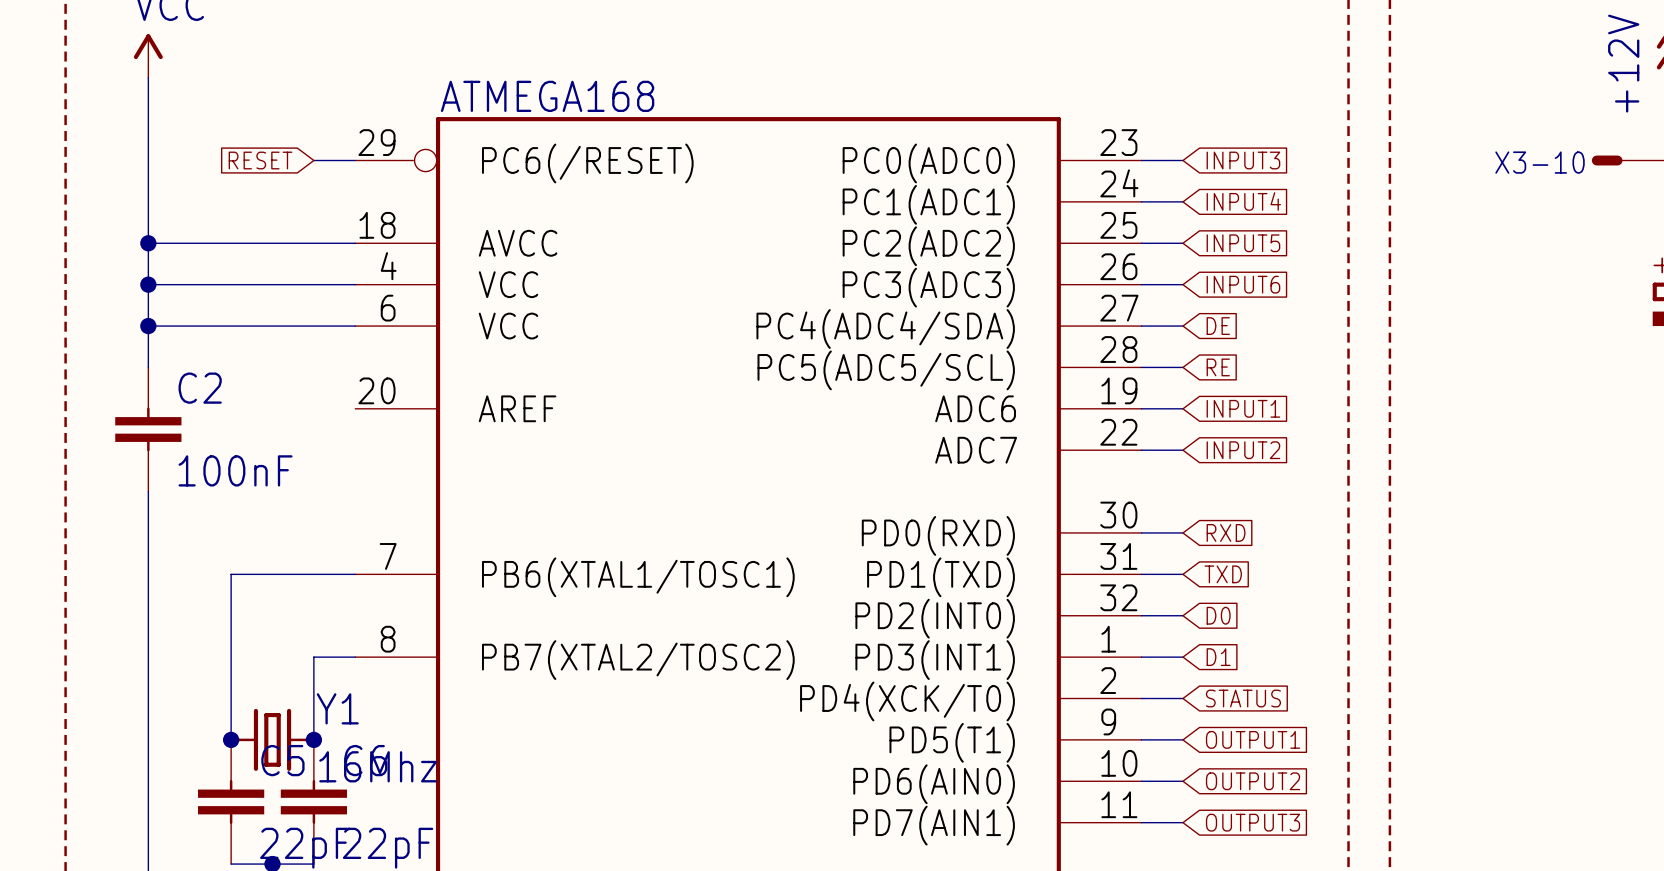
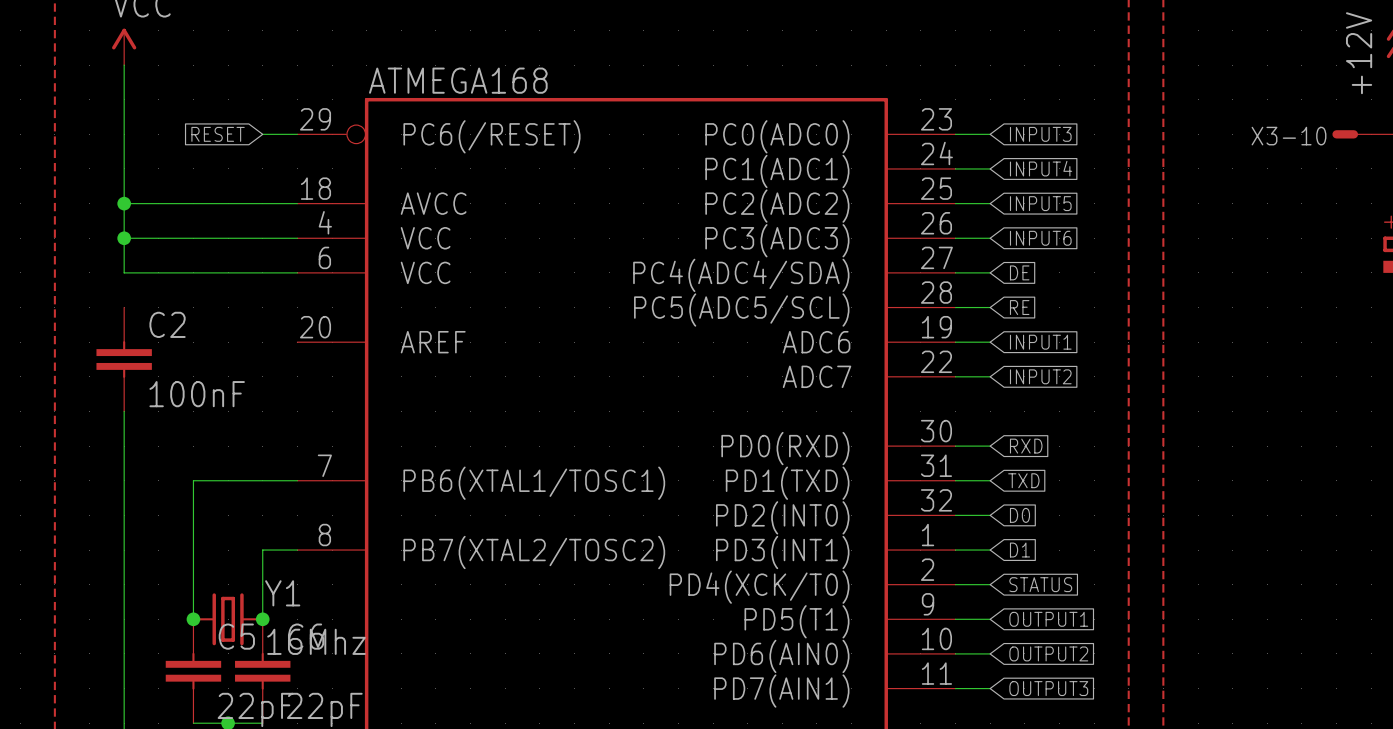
wire: (148, 326) (148, 367) -> none
junction: (148, 326) -> none

